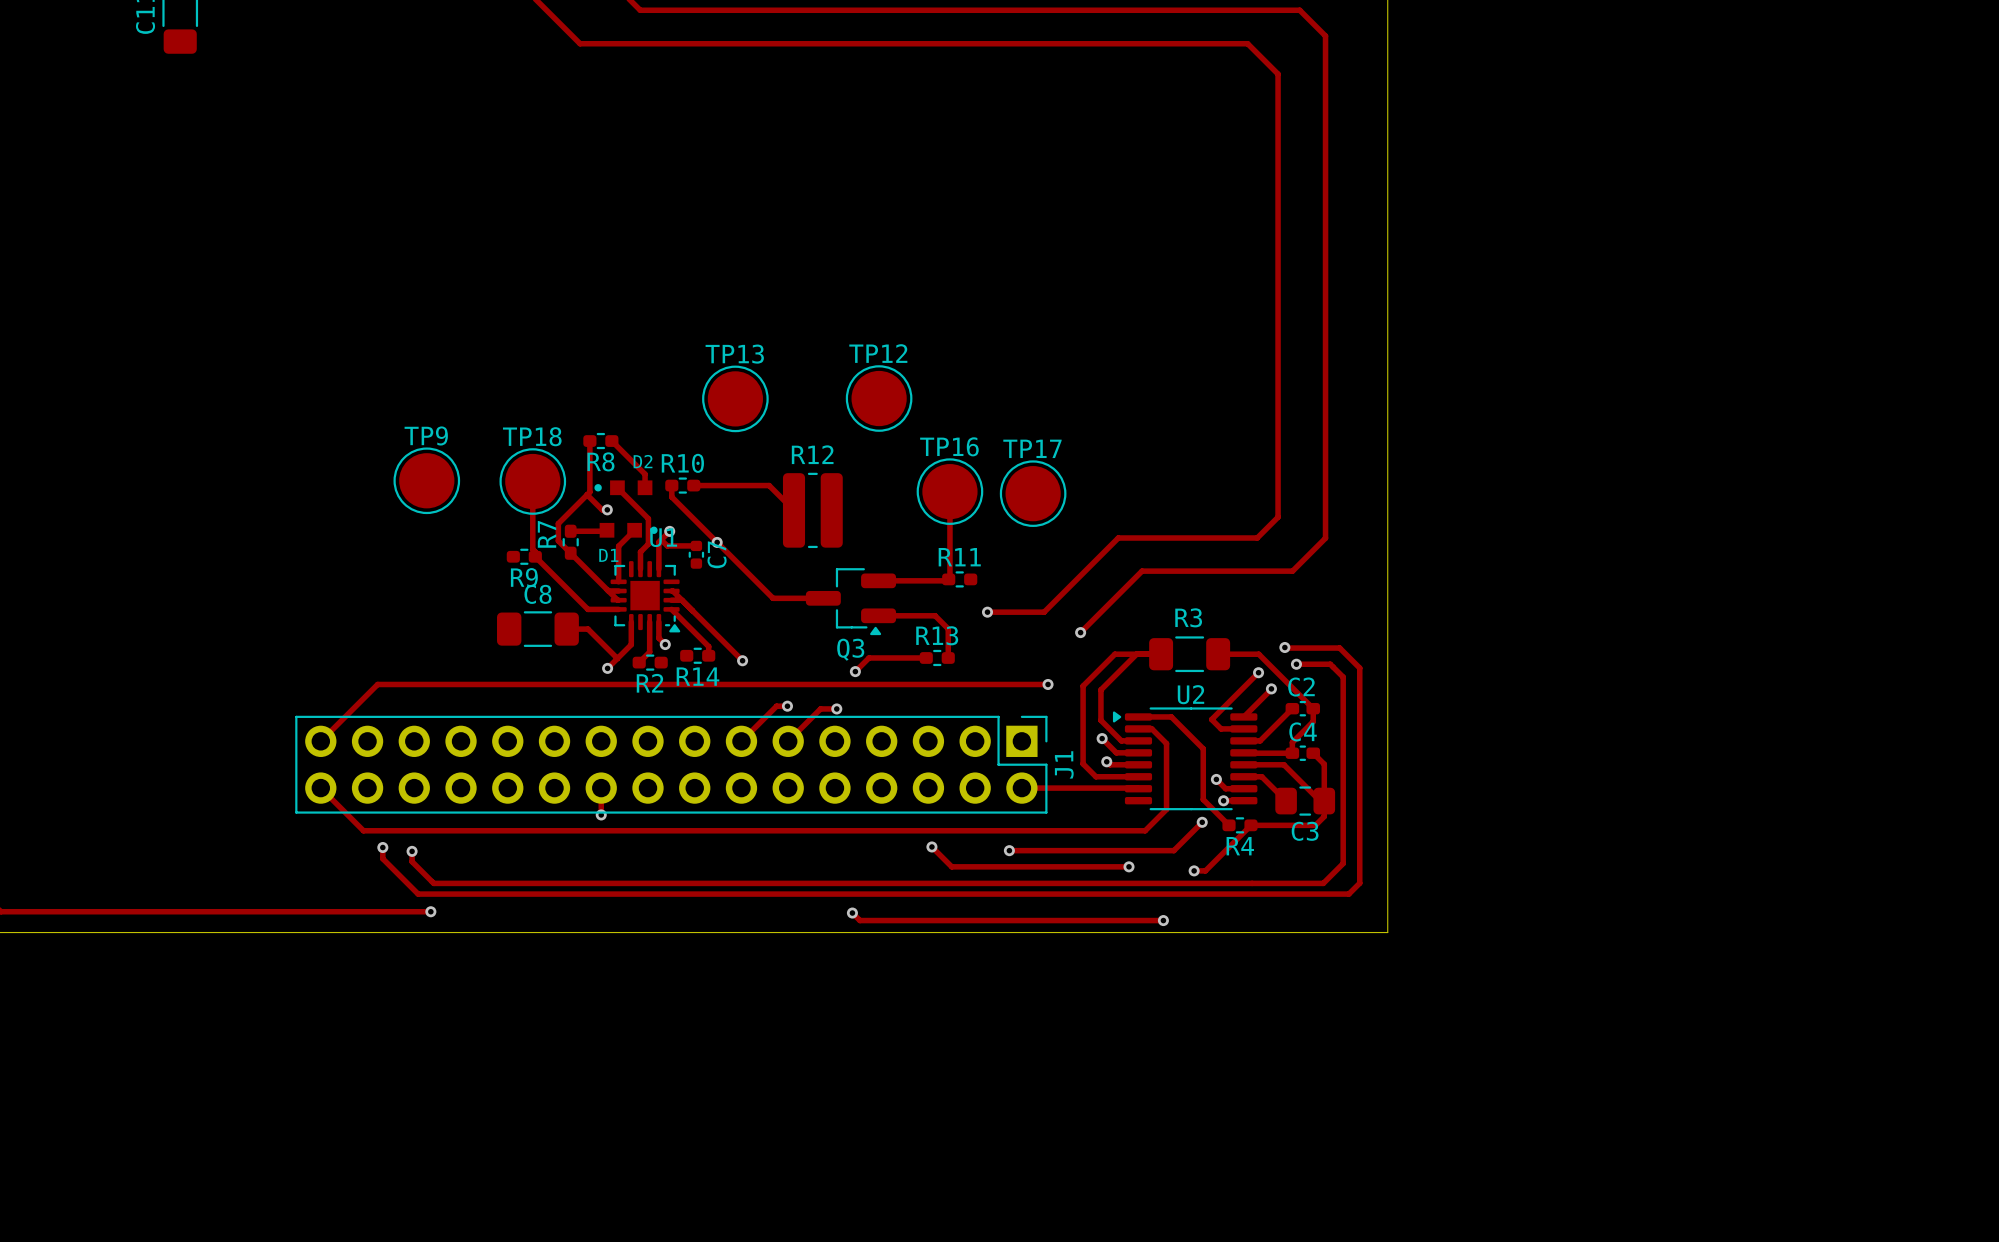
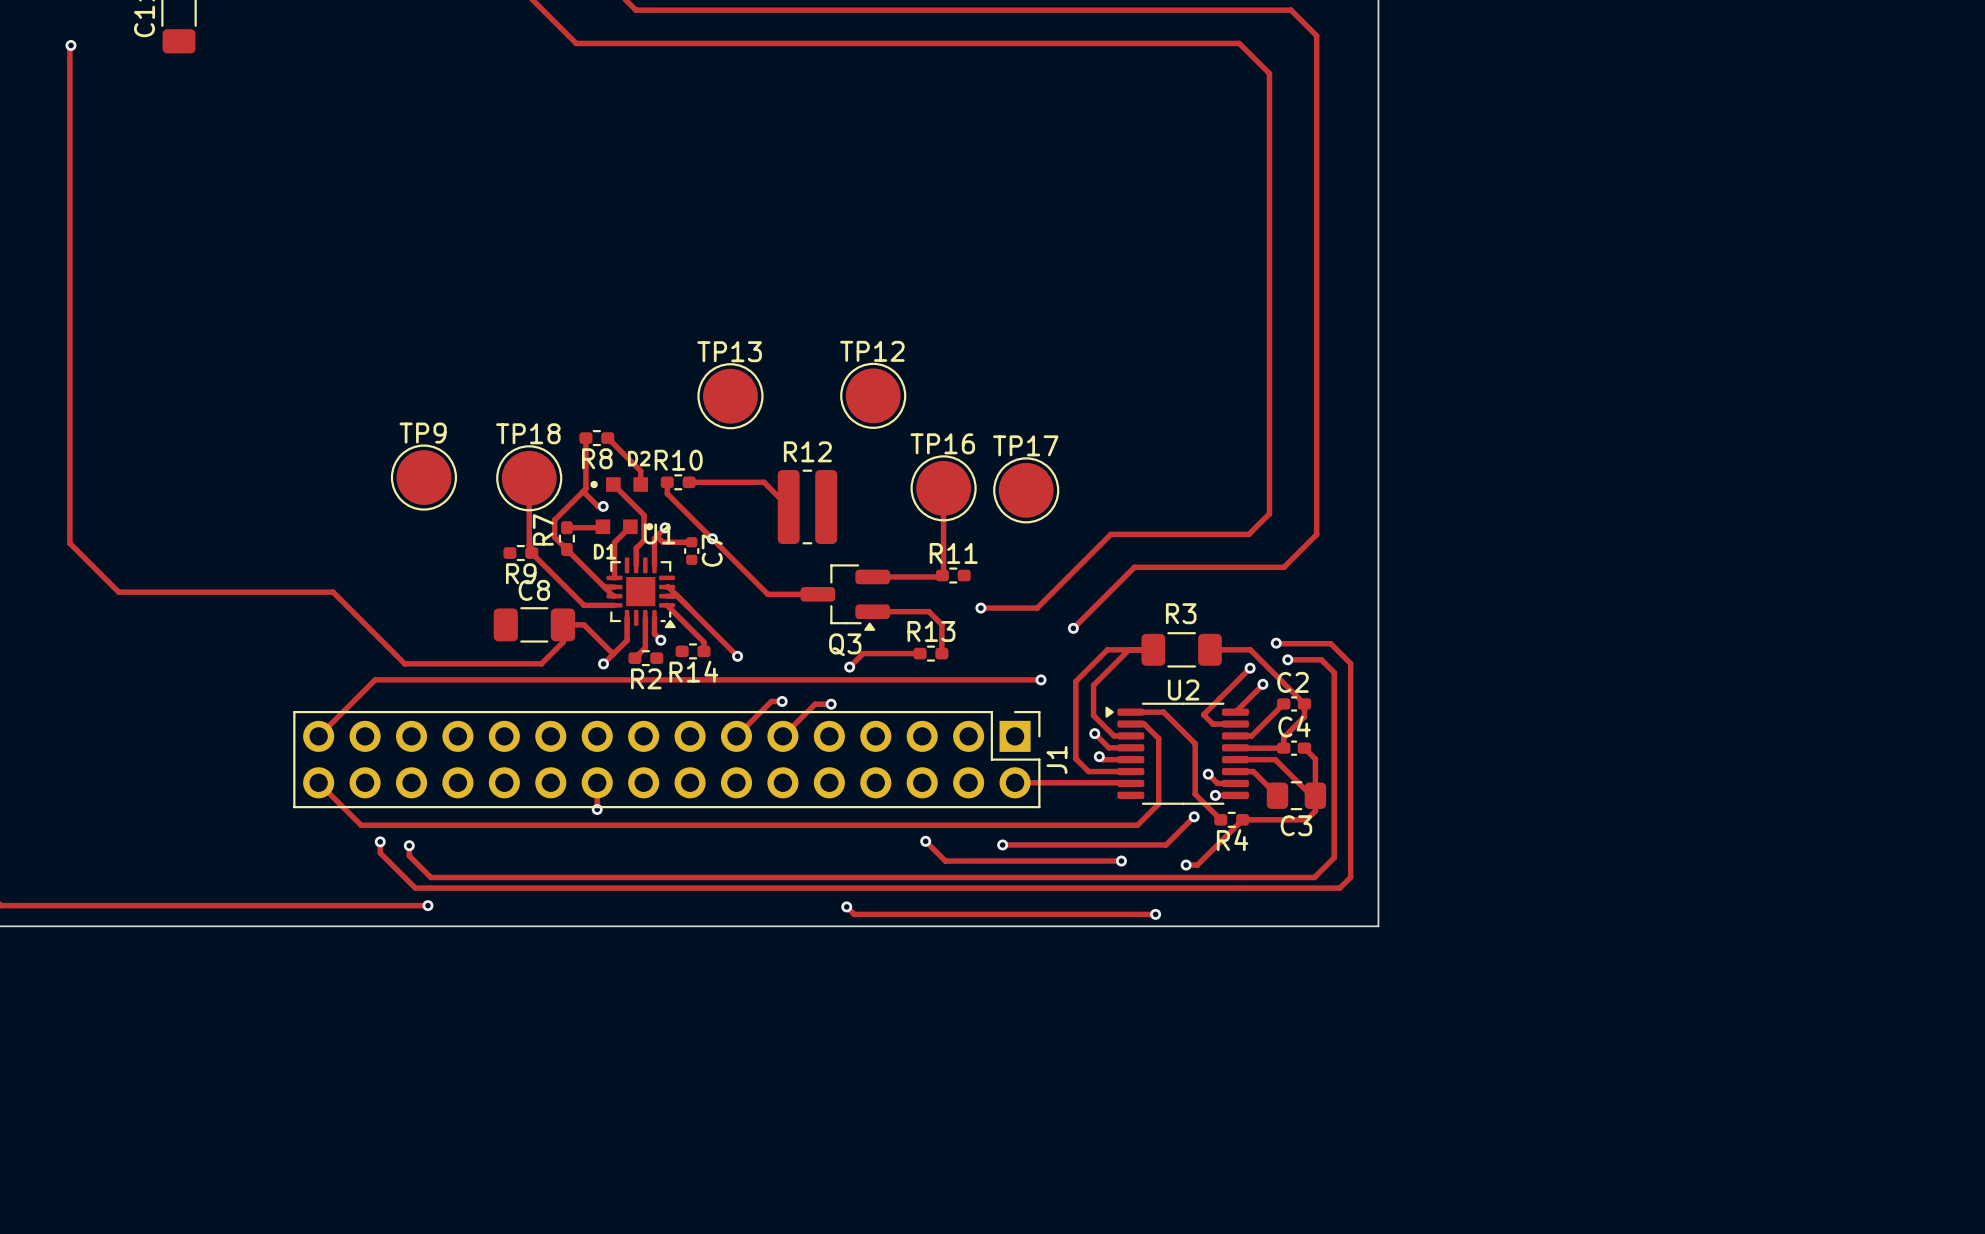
track: none -> (70, 45) (69, 543) (118, 592) (333, 592) (404, 663) (541, 663) (562, 642) (562, 624)
via: none -> (70, 45)

